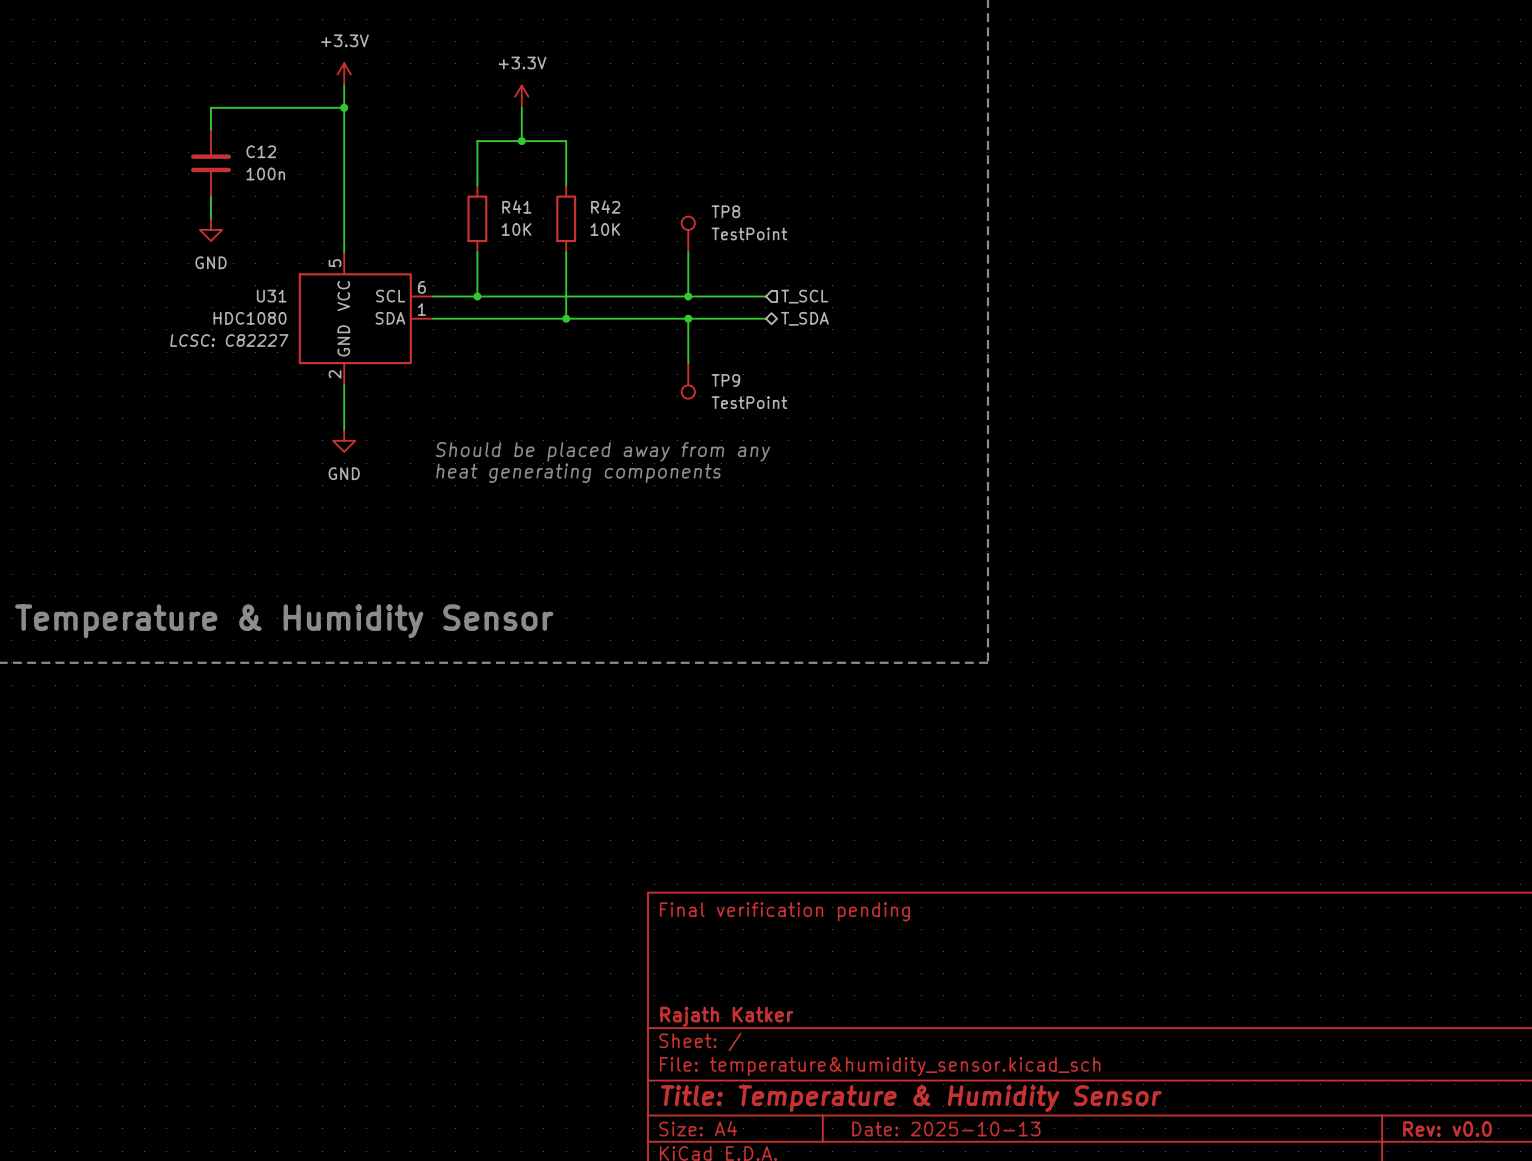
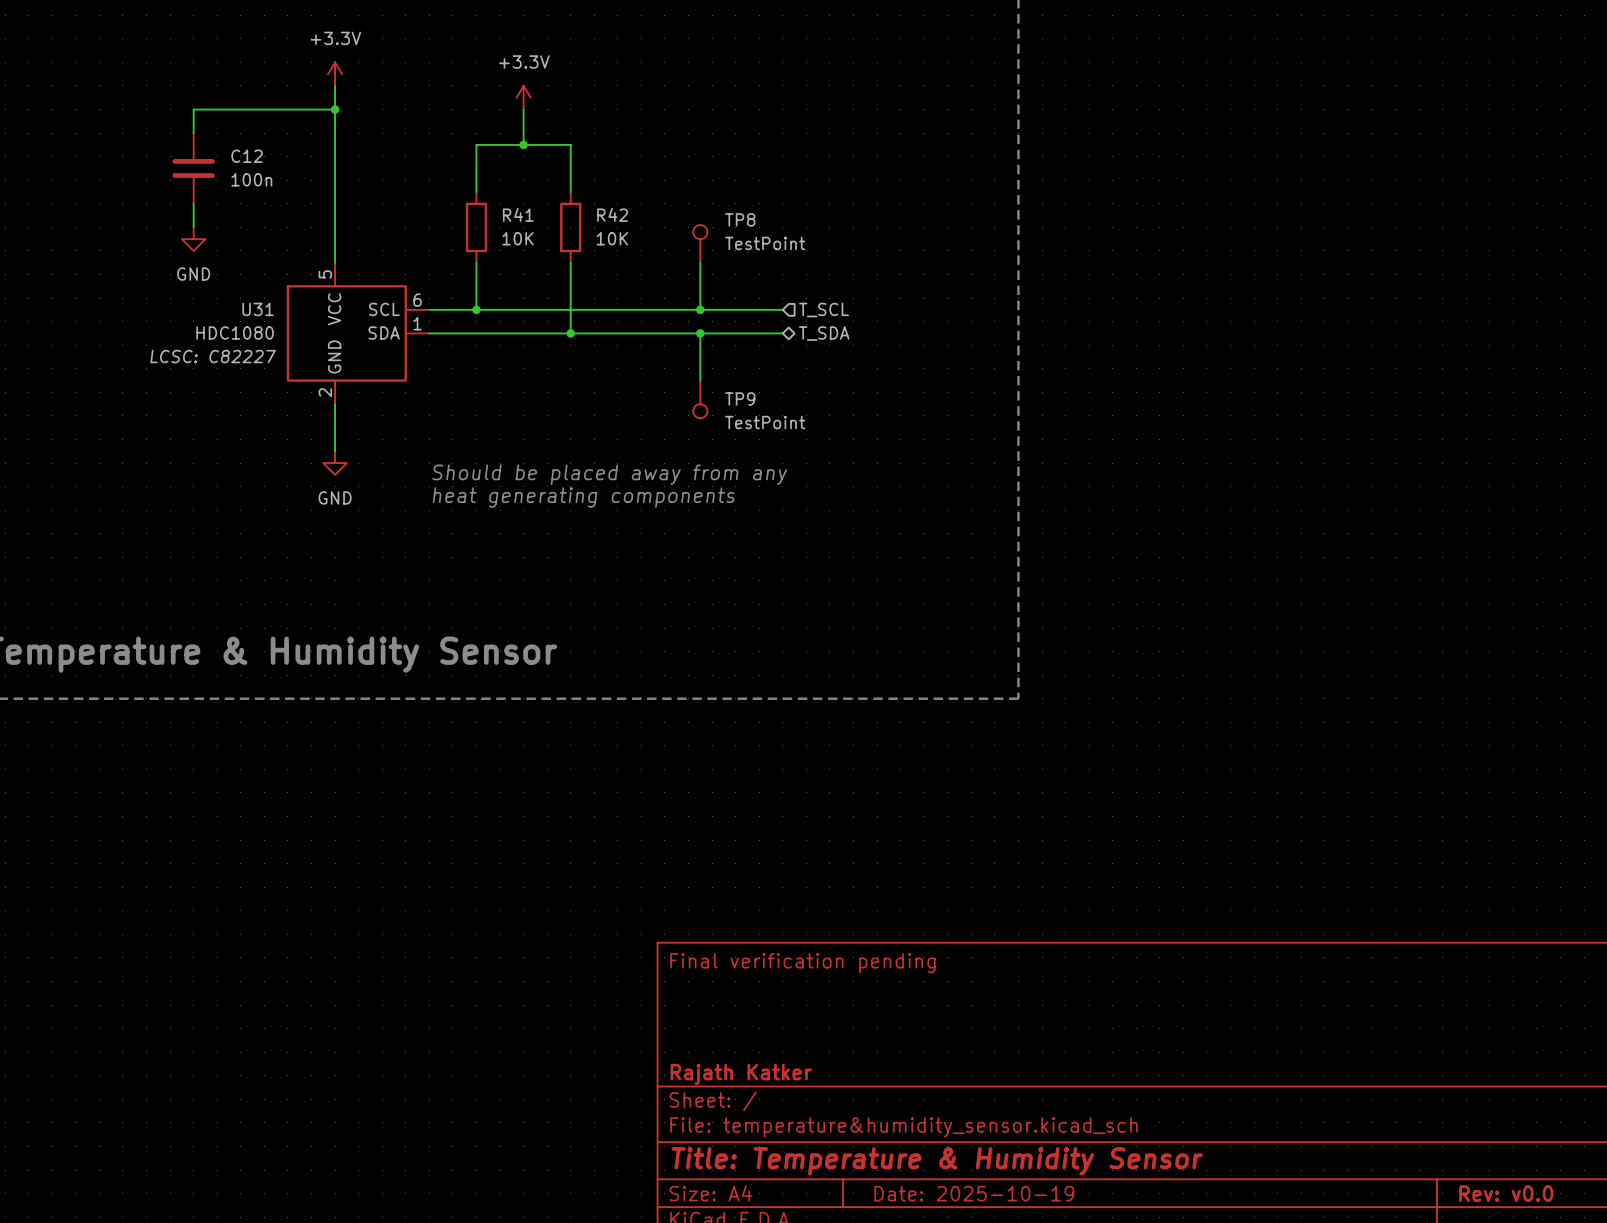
title block: Date: 2025-10-13 (946, 1129) -> Date: 2025-10-19 (974, 1193)

